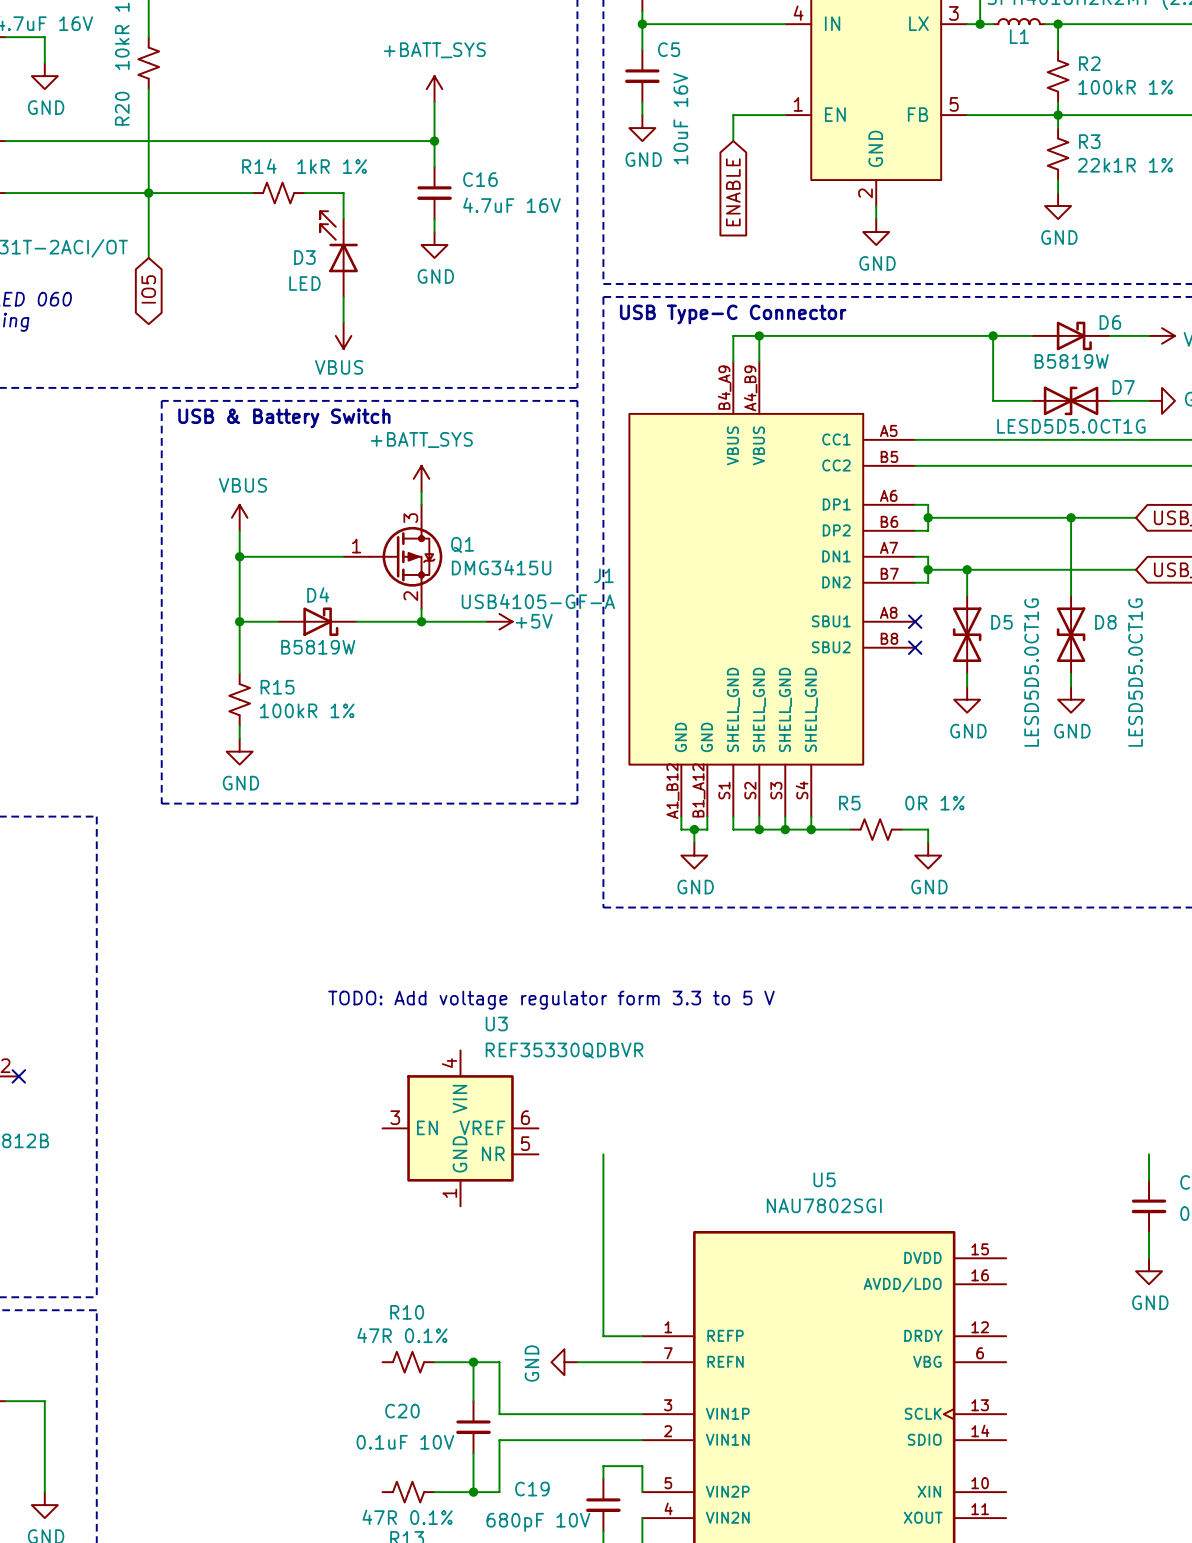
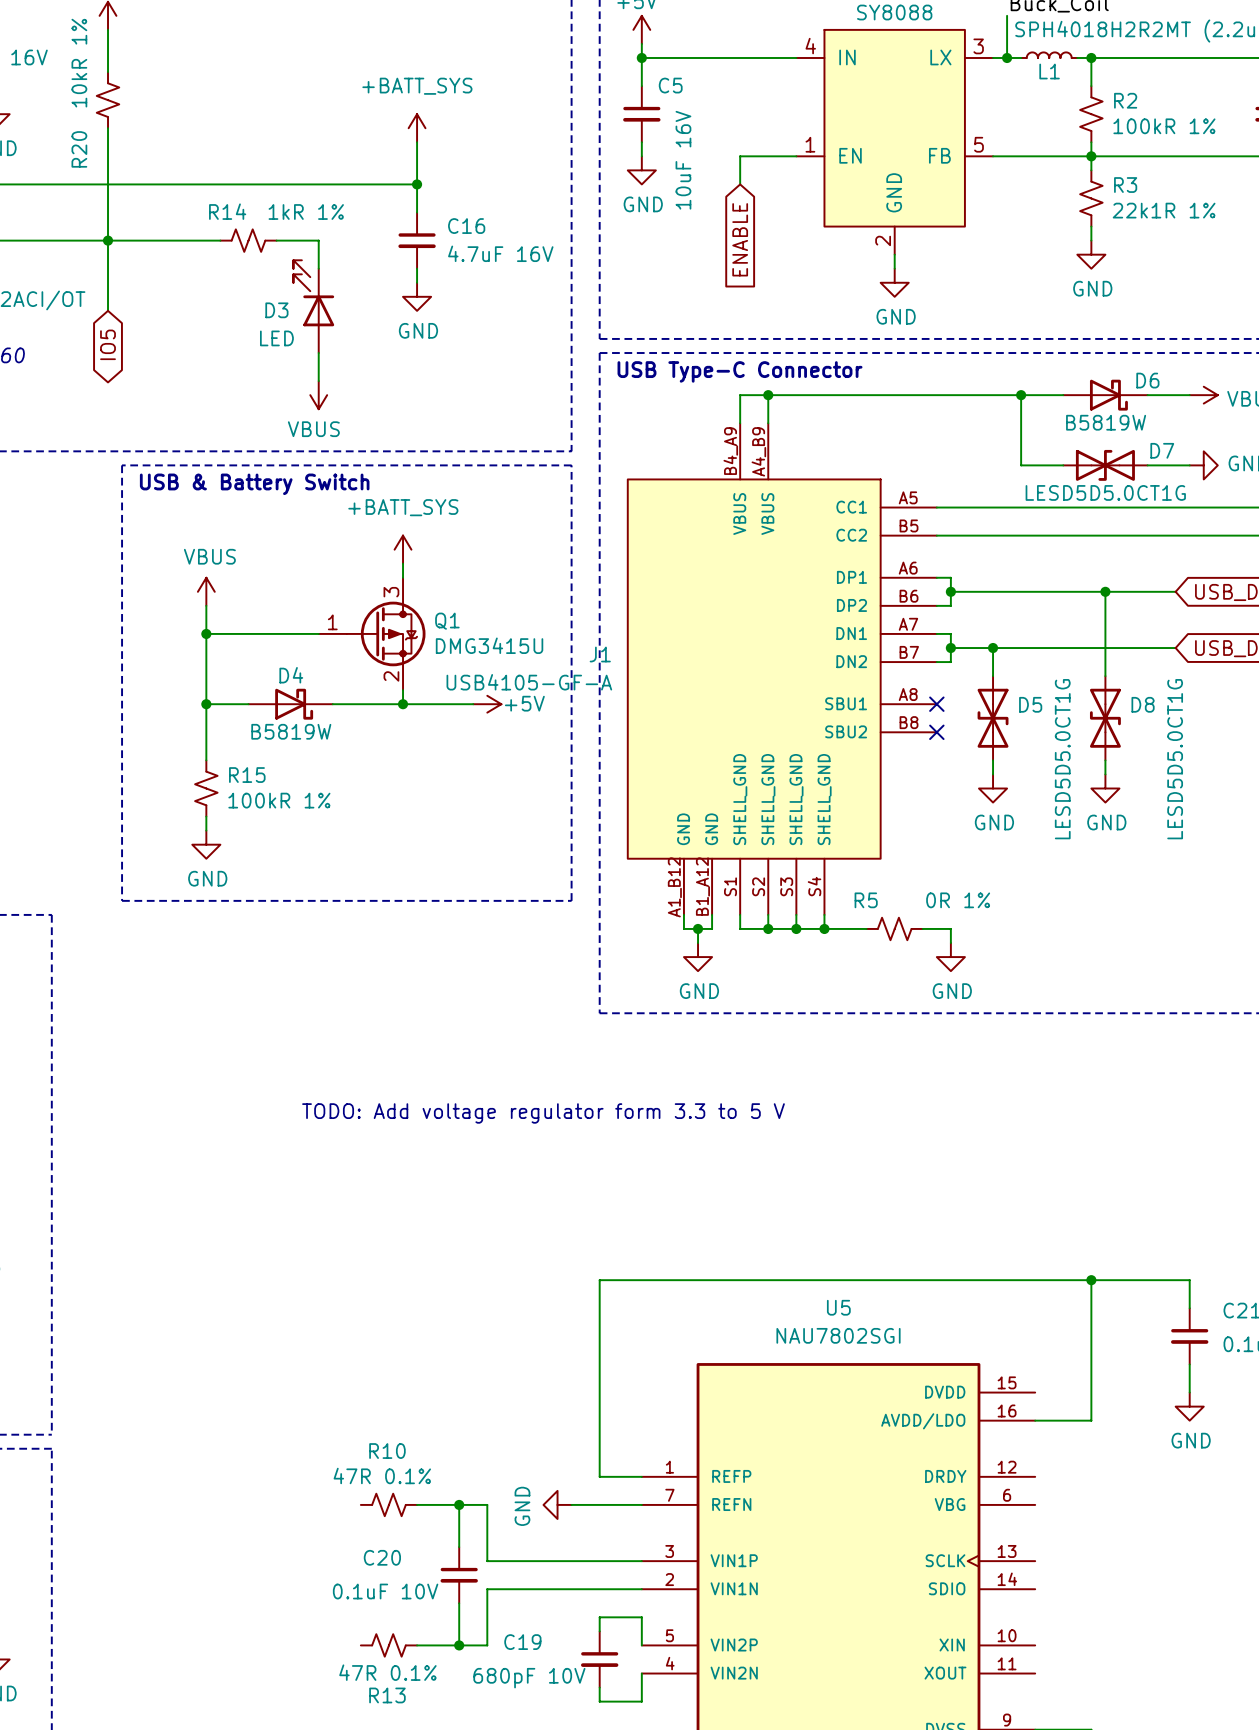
U3: REF35330QDBVR (460, 1128) -> none
wire: none -> (599, 1280) (1189, 1280)
wire: none -> (1091, 1280) (1091, 1420) (1035, 1420)
junction: none -> (1091, 1280)

